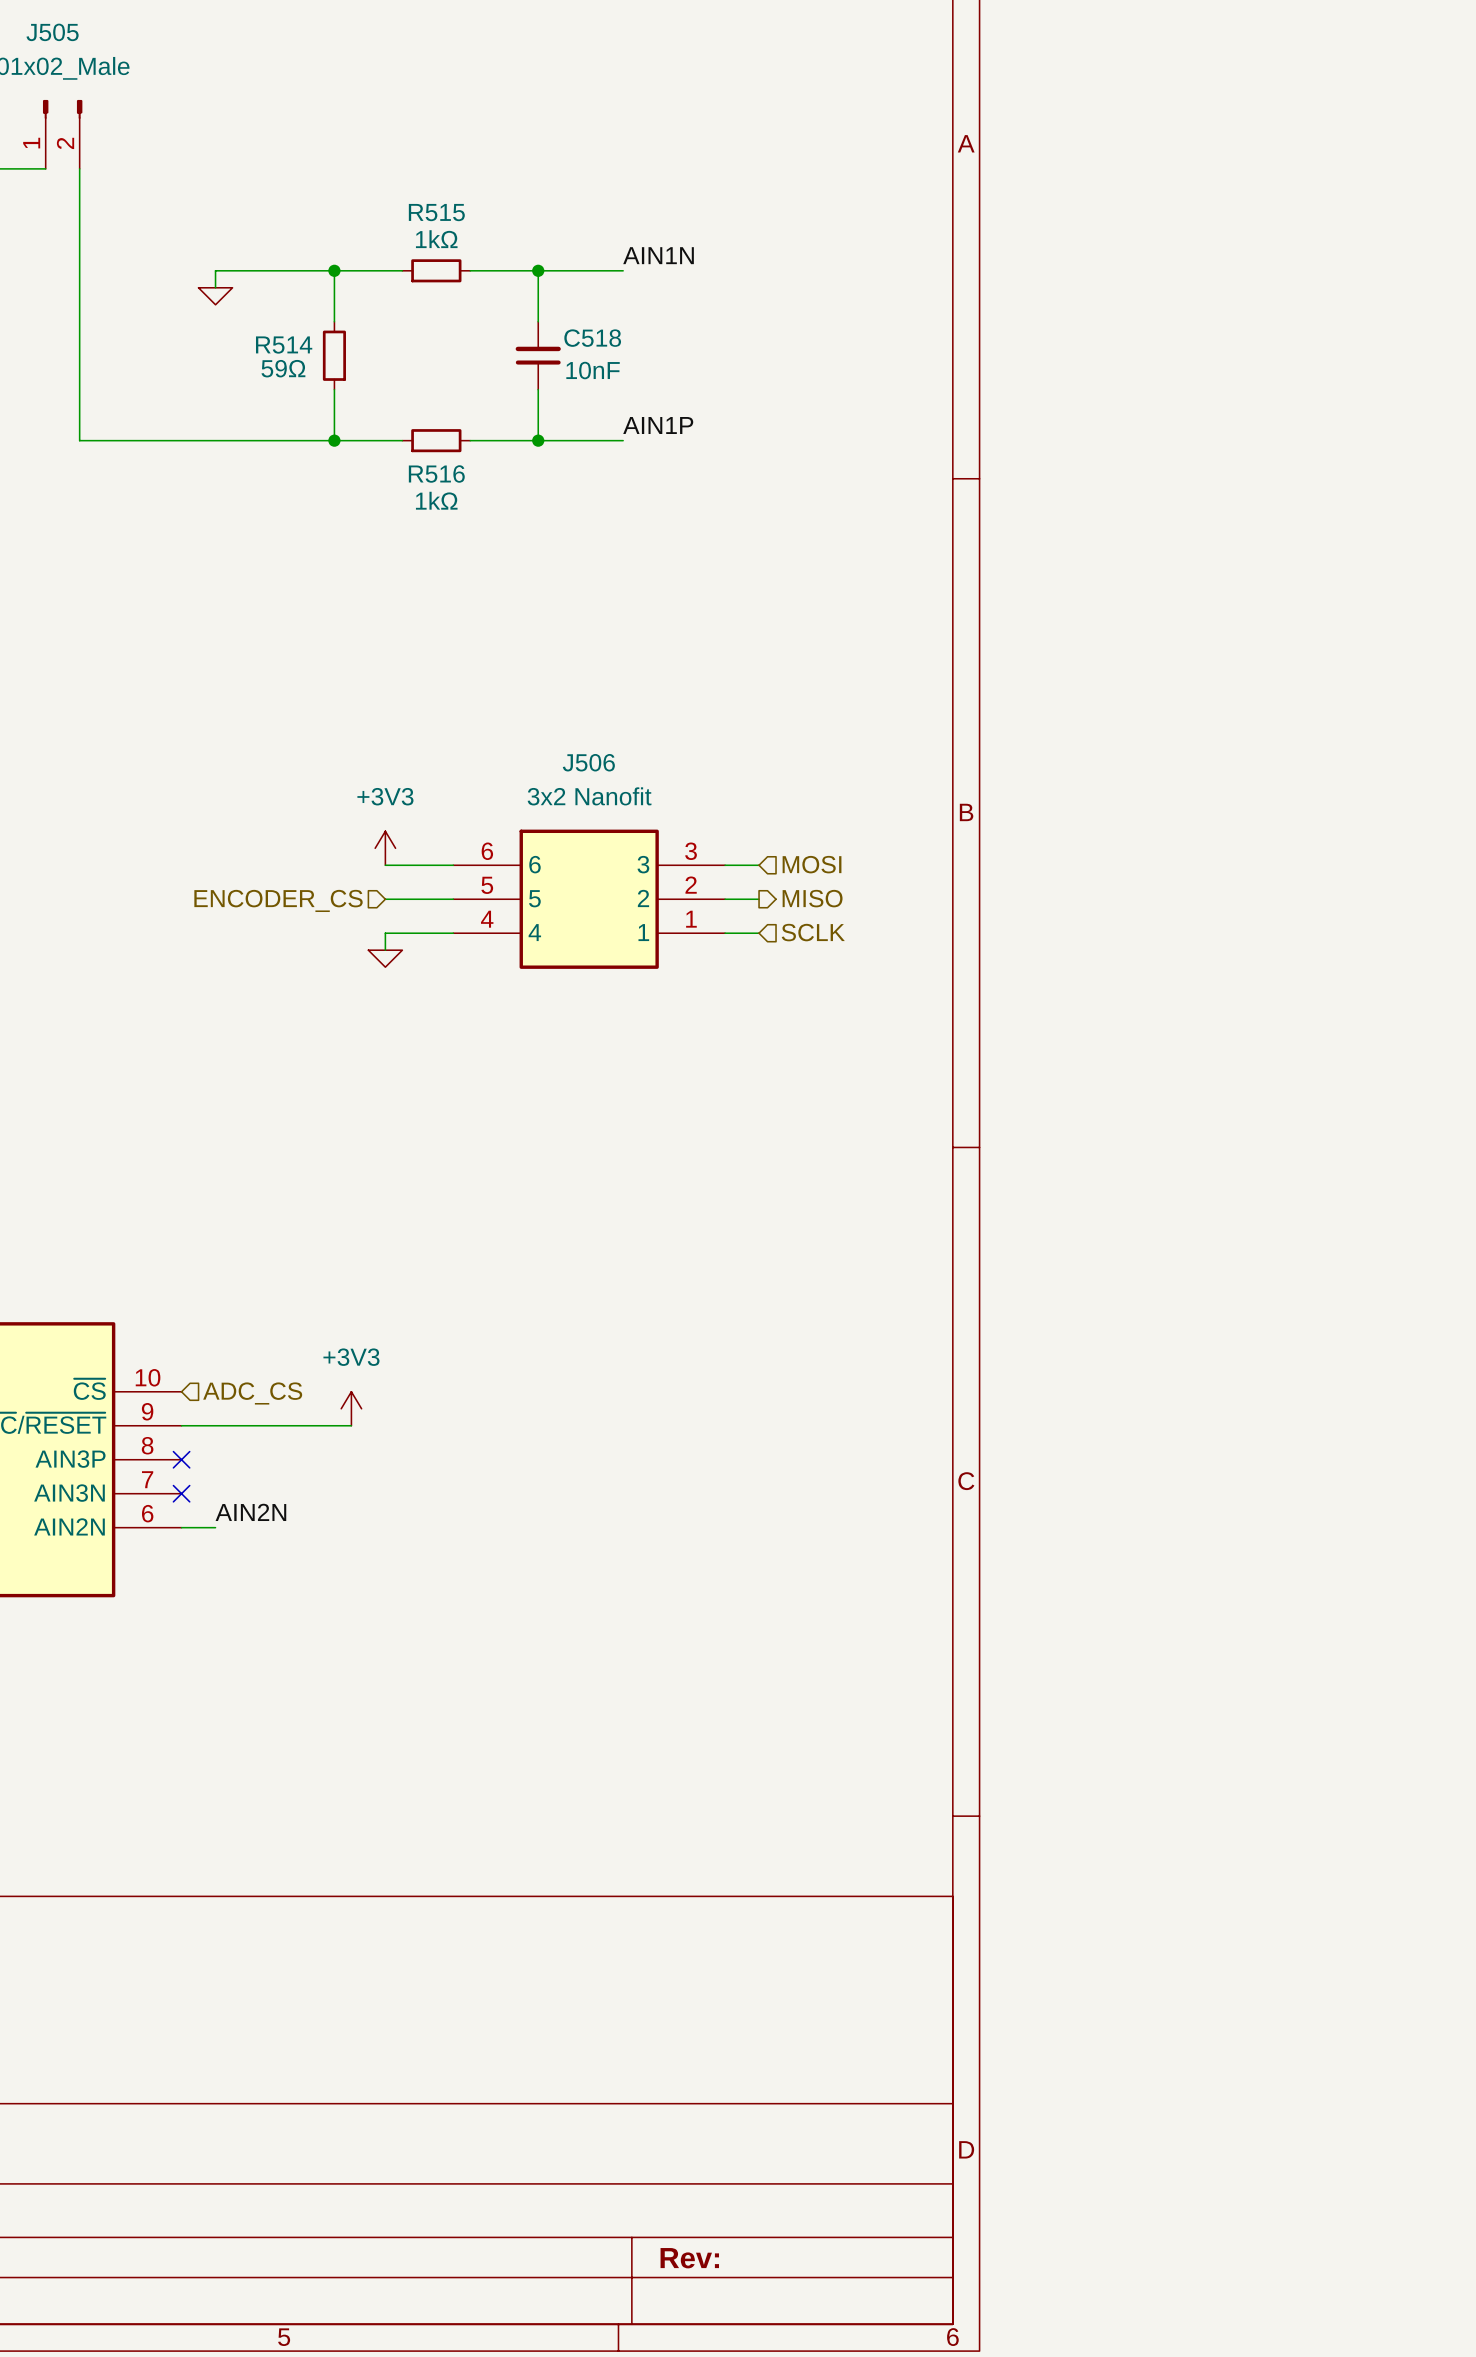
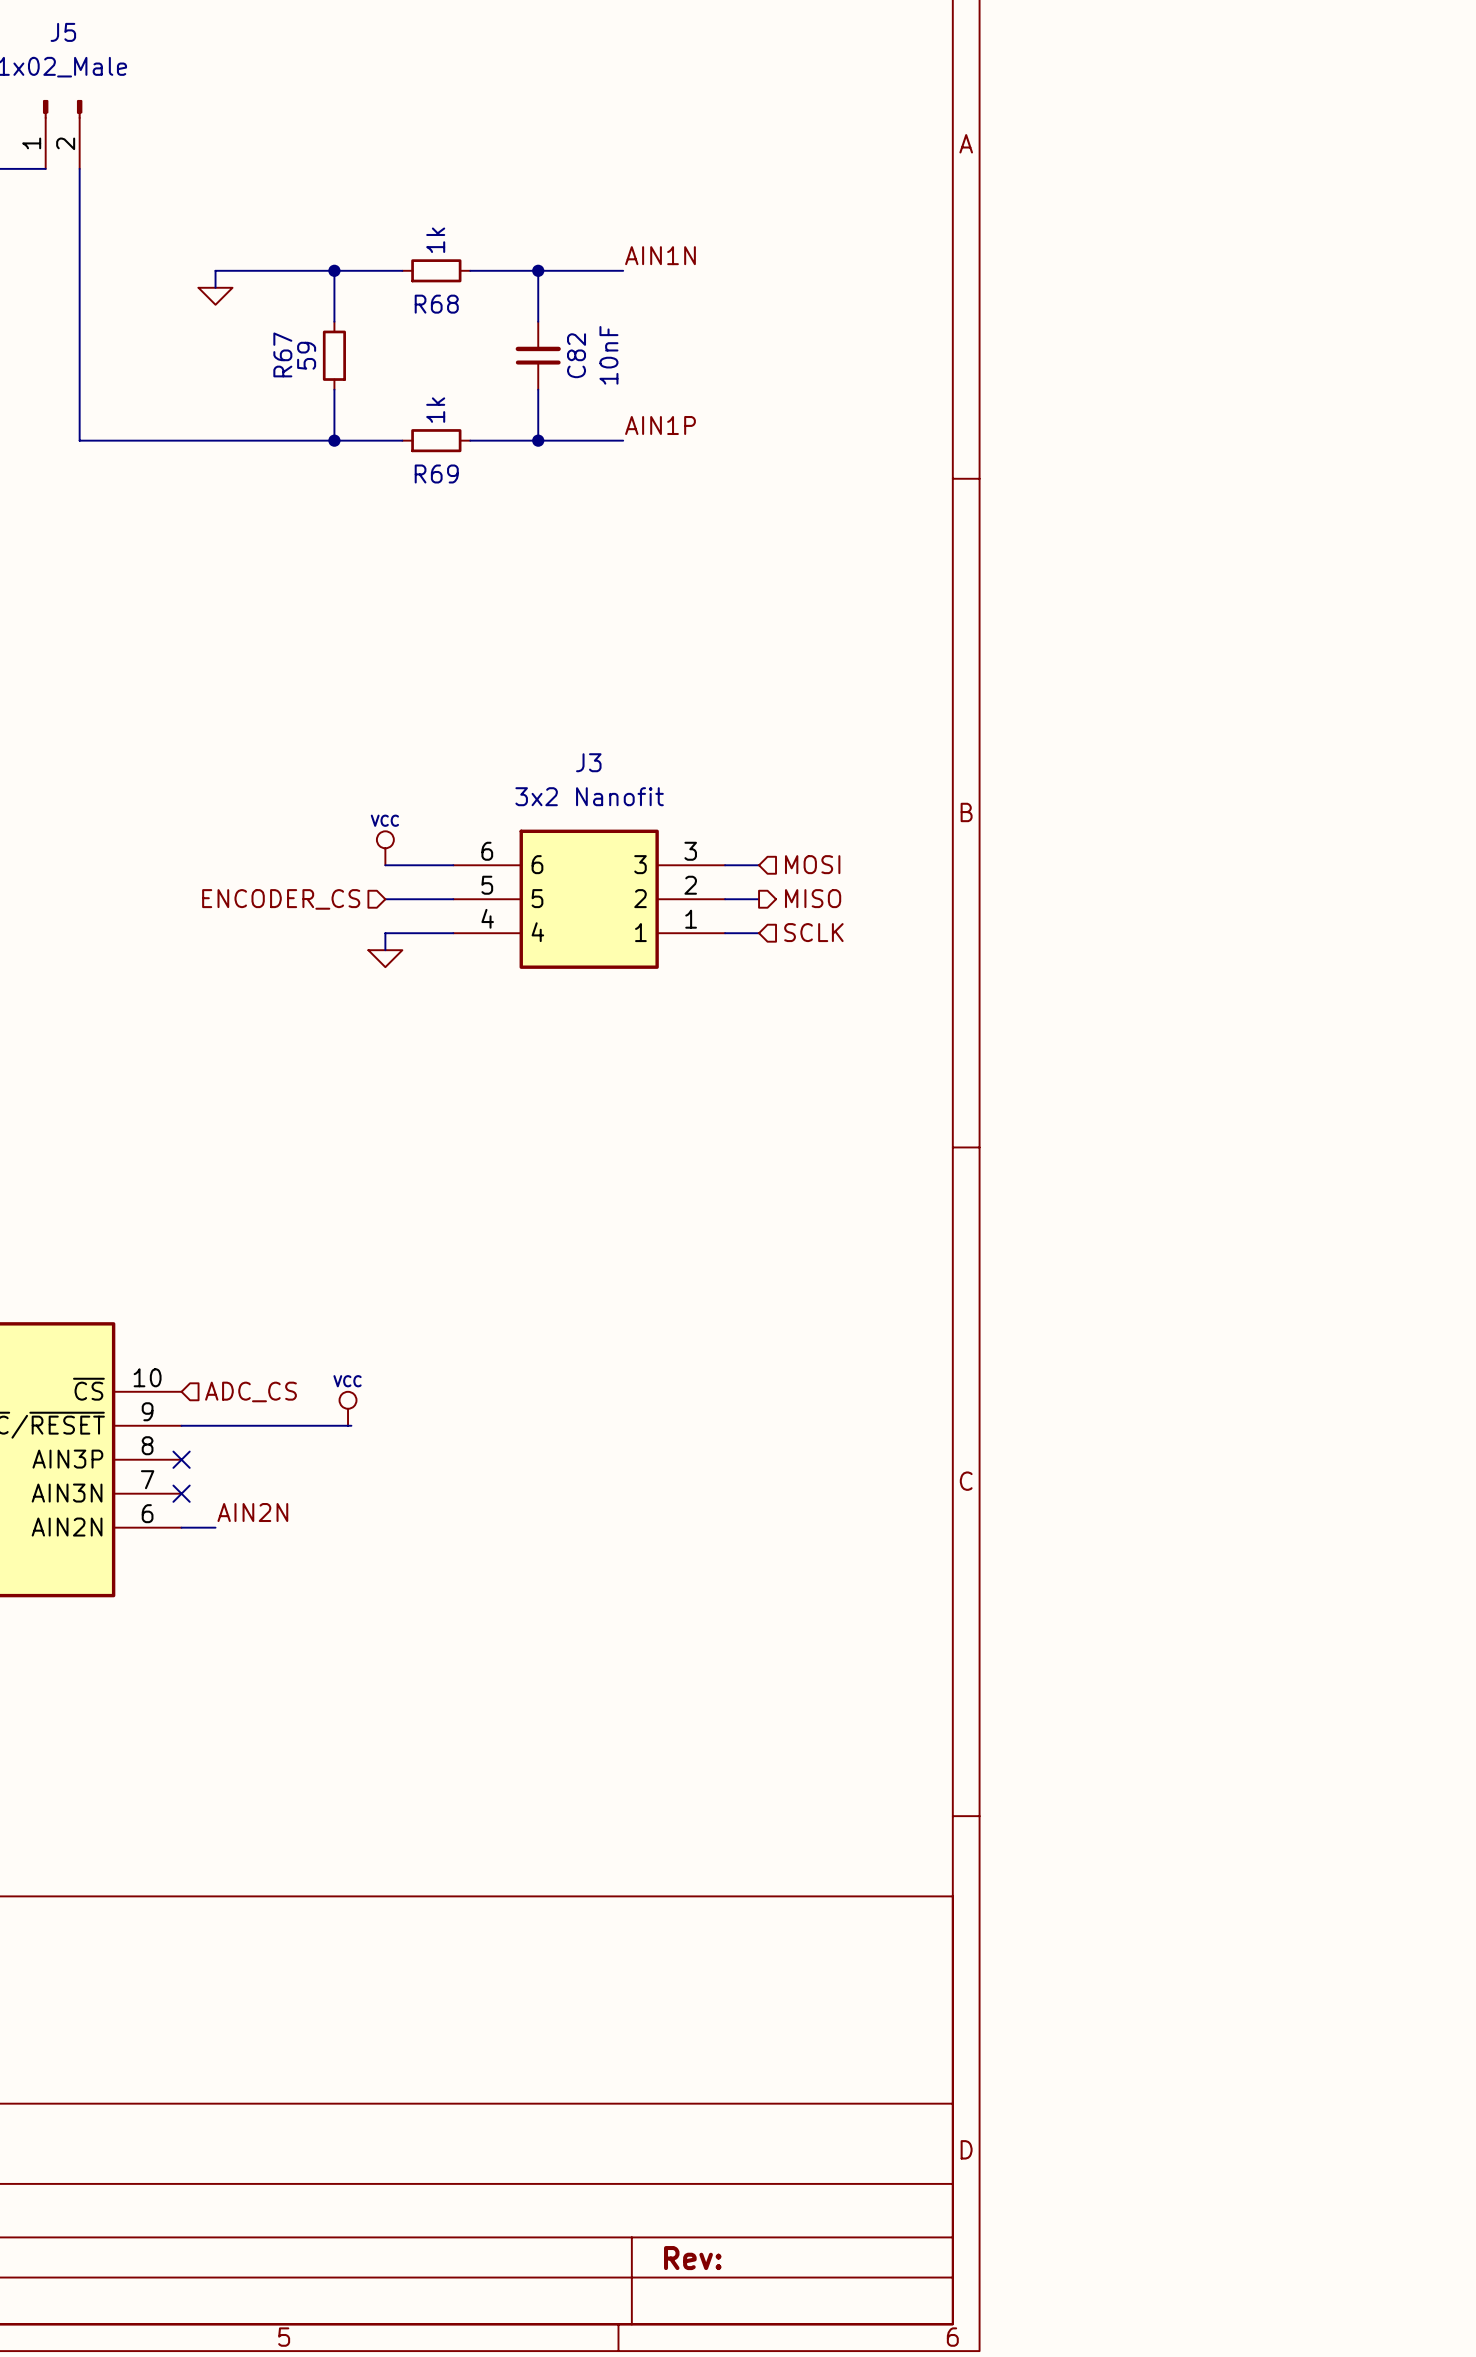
J505 name: J505 (52, 32) -> J5 (63, 32)
R515 name: R515 (436, 212) -> R68 (436, 304)
R515 value: 1kΩ (436, 239) -> 1k (435, 240)
C518 name: C518 (592, 338) -> C82 (576, 355)
R514 name: R514 (284, 345) -> R67 (282, 354)
R514 value: 59Ω (283, 368) -> 59 (306, 355)
C518 value rotation: 0° (593, 370) -> 90° counterclockwise (608, 355)
R516 name: R516 (436, 473) -> R69 (436, 473)
R516 value: 1kΩ (436, 500) -> 1k (435, 410)
J506 name: J506 (588, 762) -> J3 (588, 762)
power symbol: +3V3 (385, 848) -> VCC (385, 848)
power symbol: +3V3 (351, 1408) -> VCC (348, 1408)

